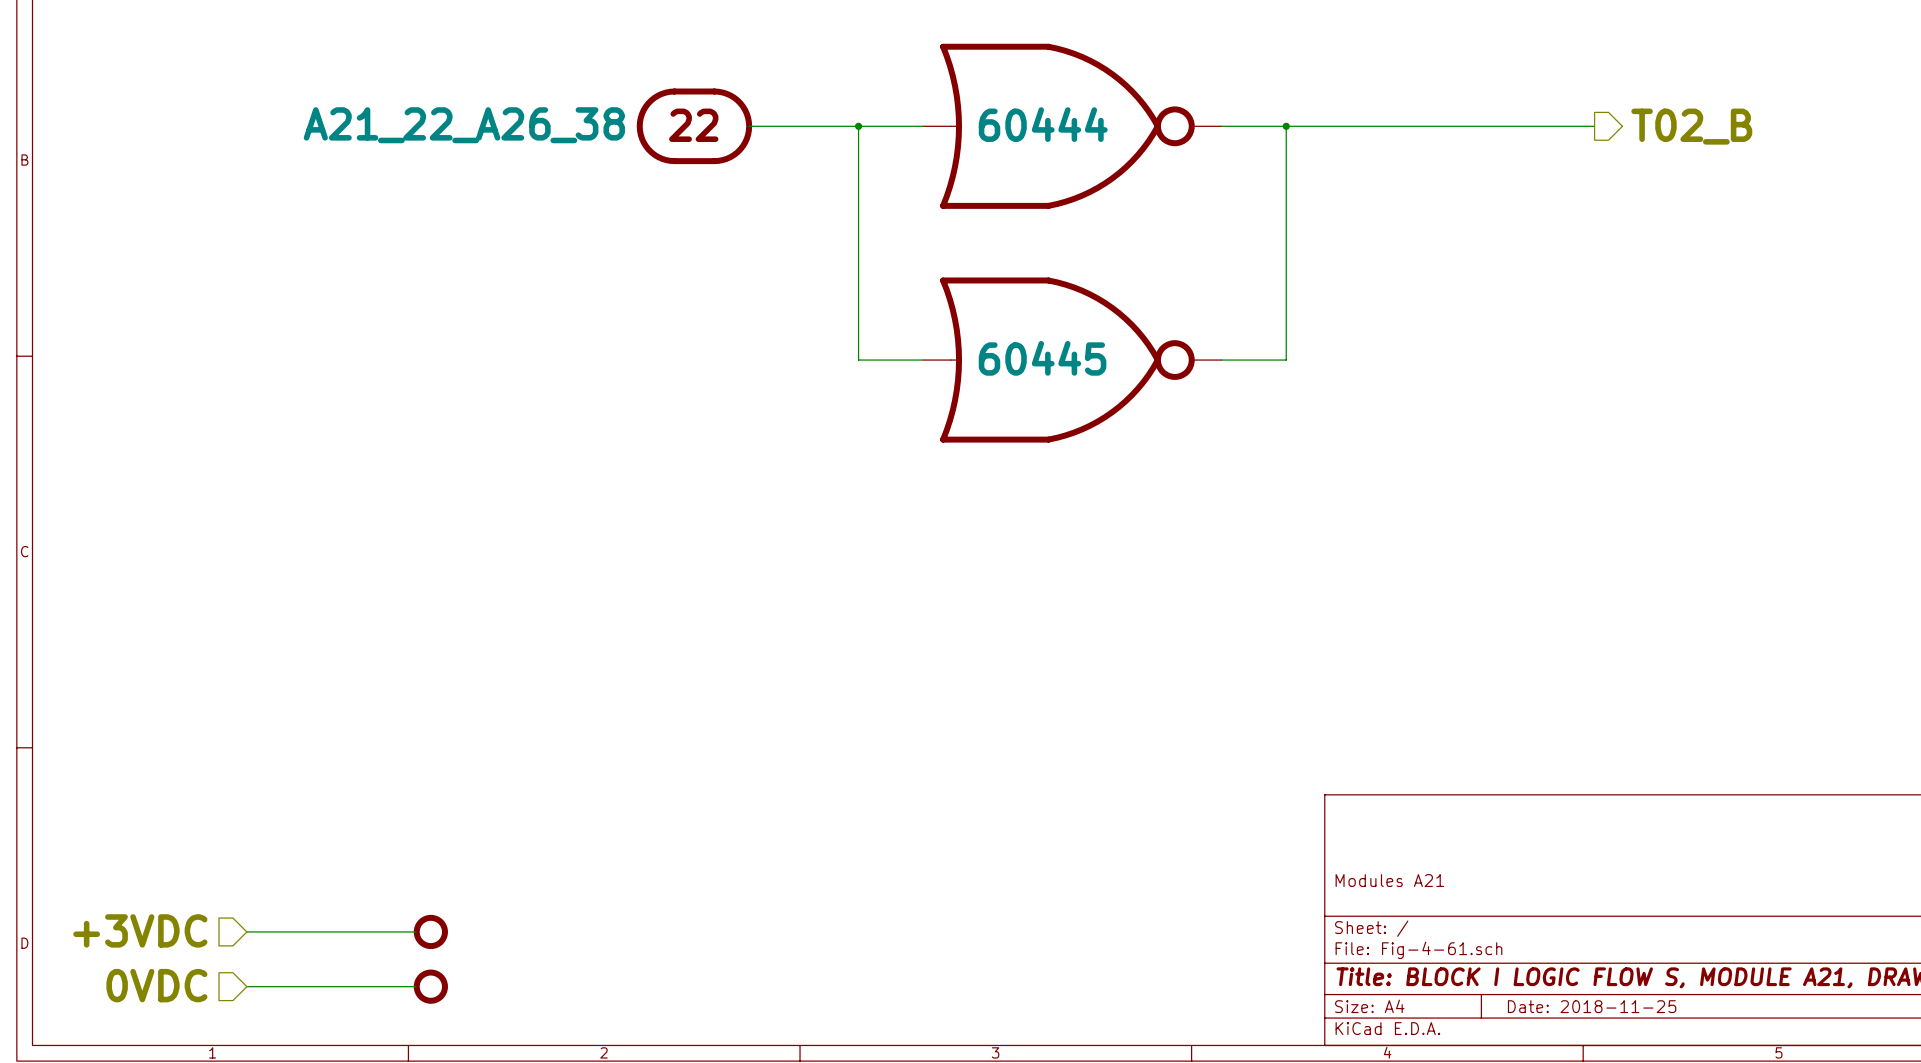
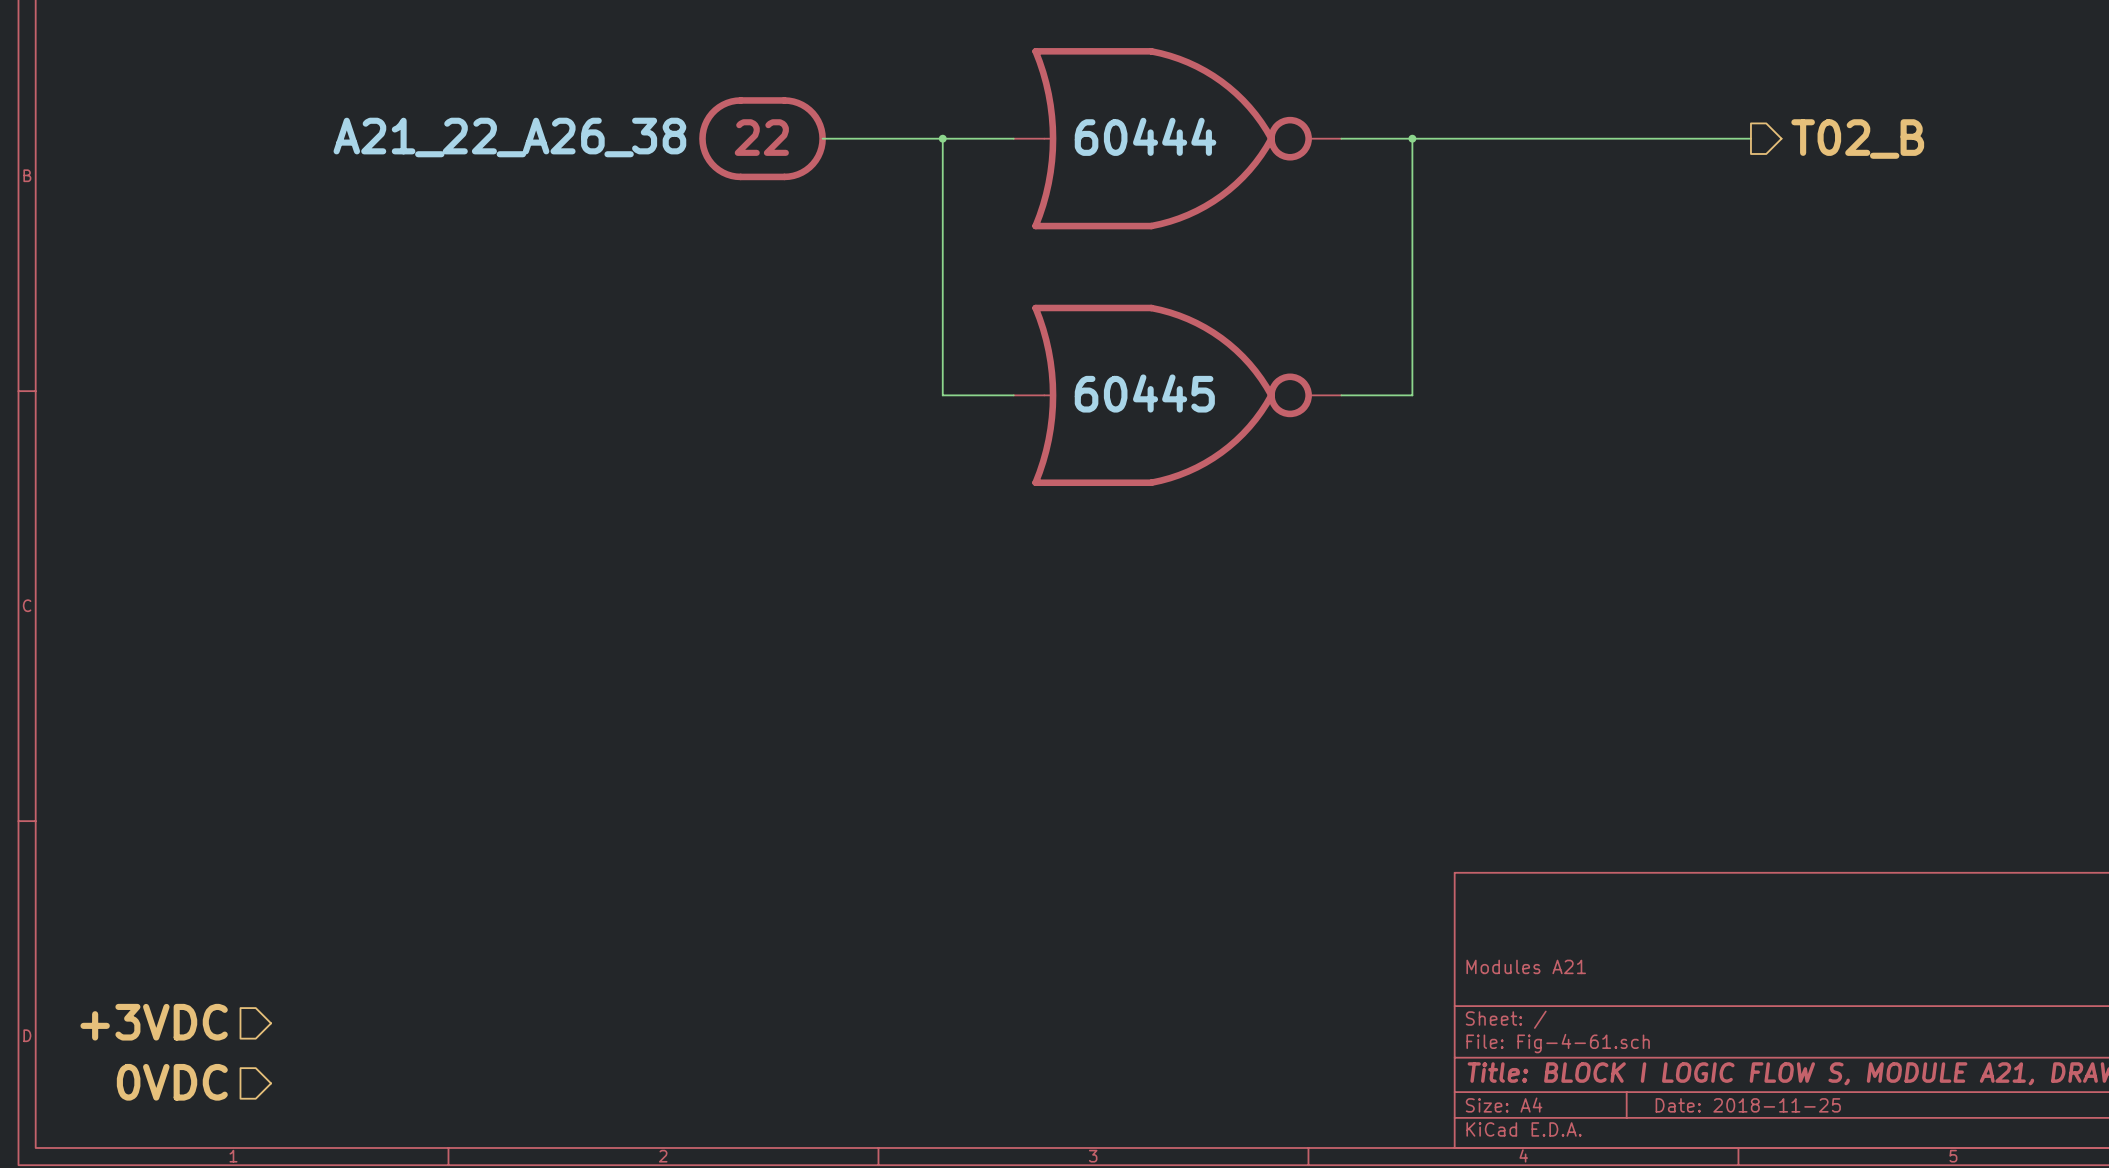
wire: (246, 931) (415, 931) -> none
part: (430, 931) -> none
wire: (246, 986) (415, 986) -> none
part: (430, 986) -> none

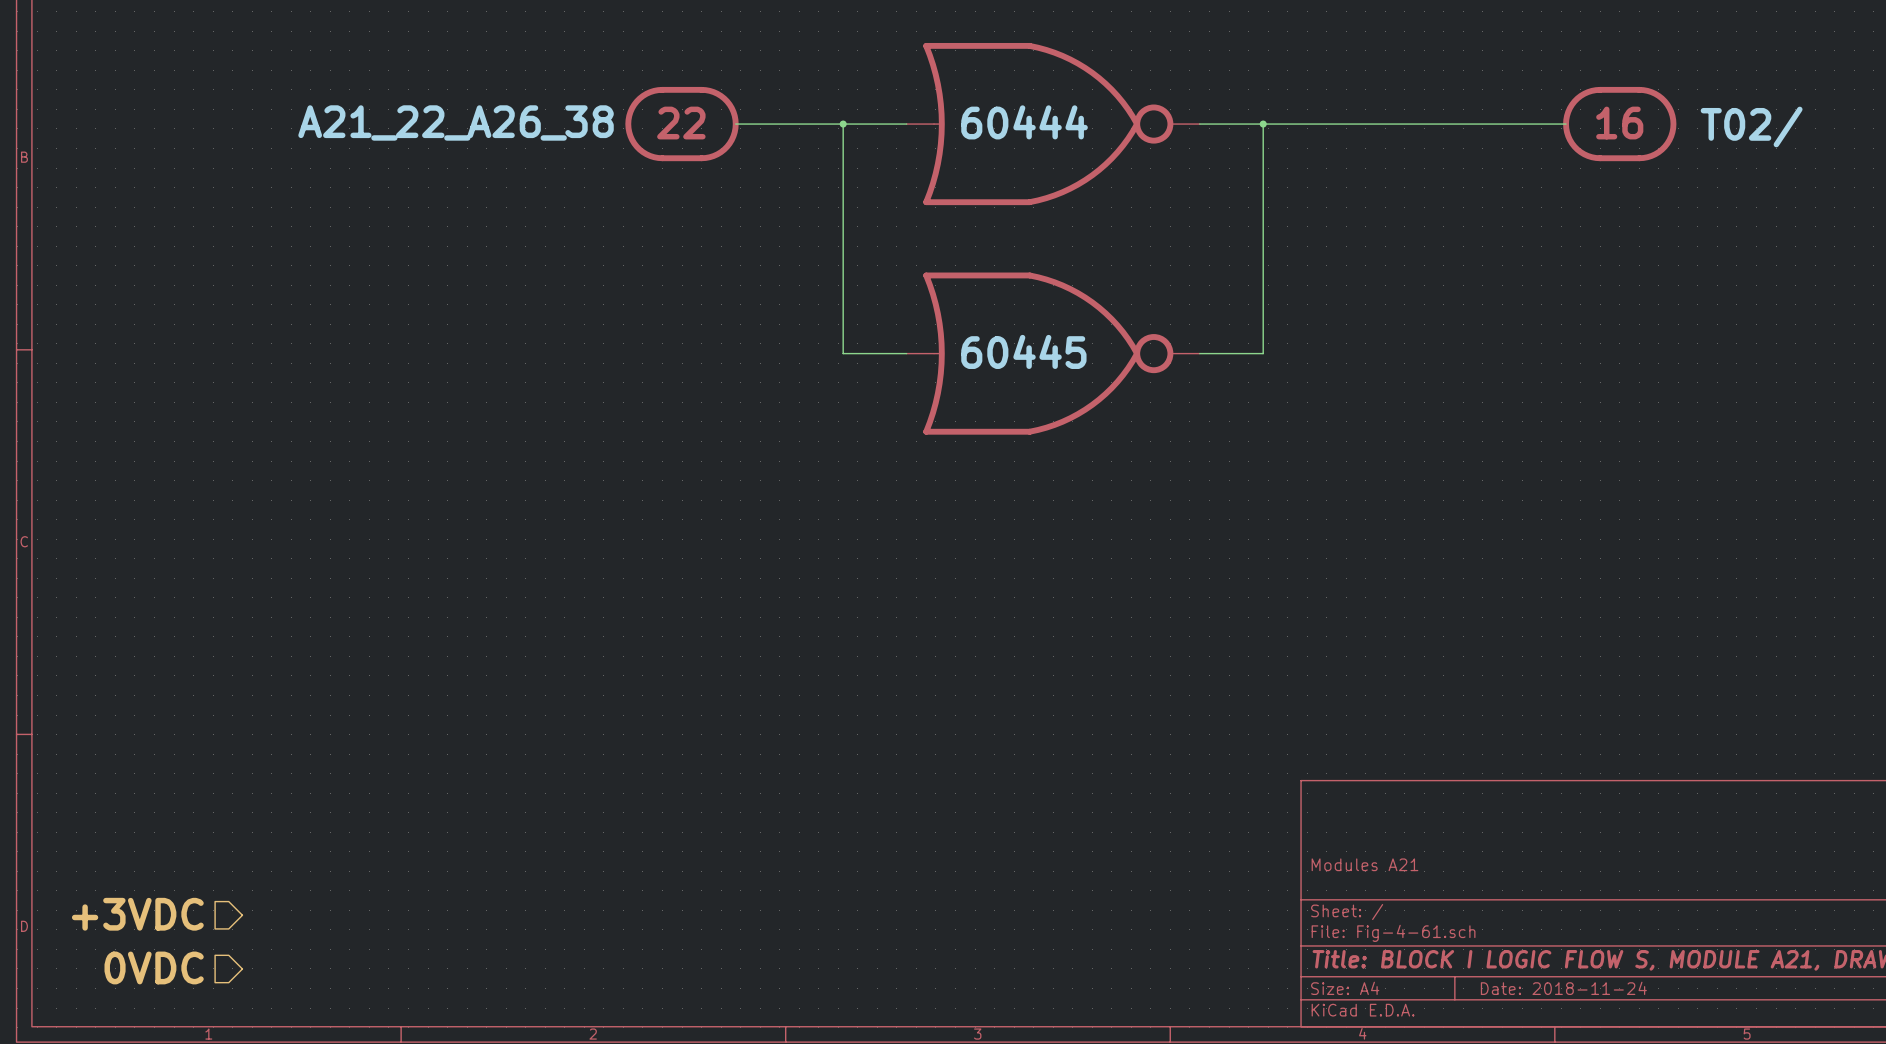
part: none -> (1619, 124)
hierarchical label: T02_B (1857, 139) -> none
title block: Date: 2018-11-25 (1748, 1105) -> Date: 2018-11-24 (1563, 988)

